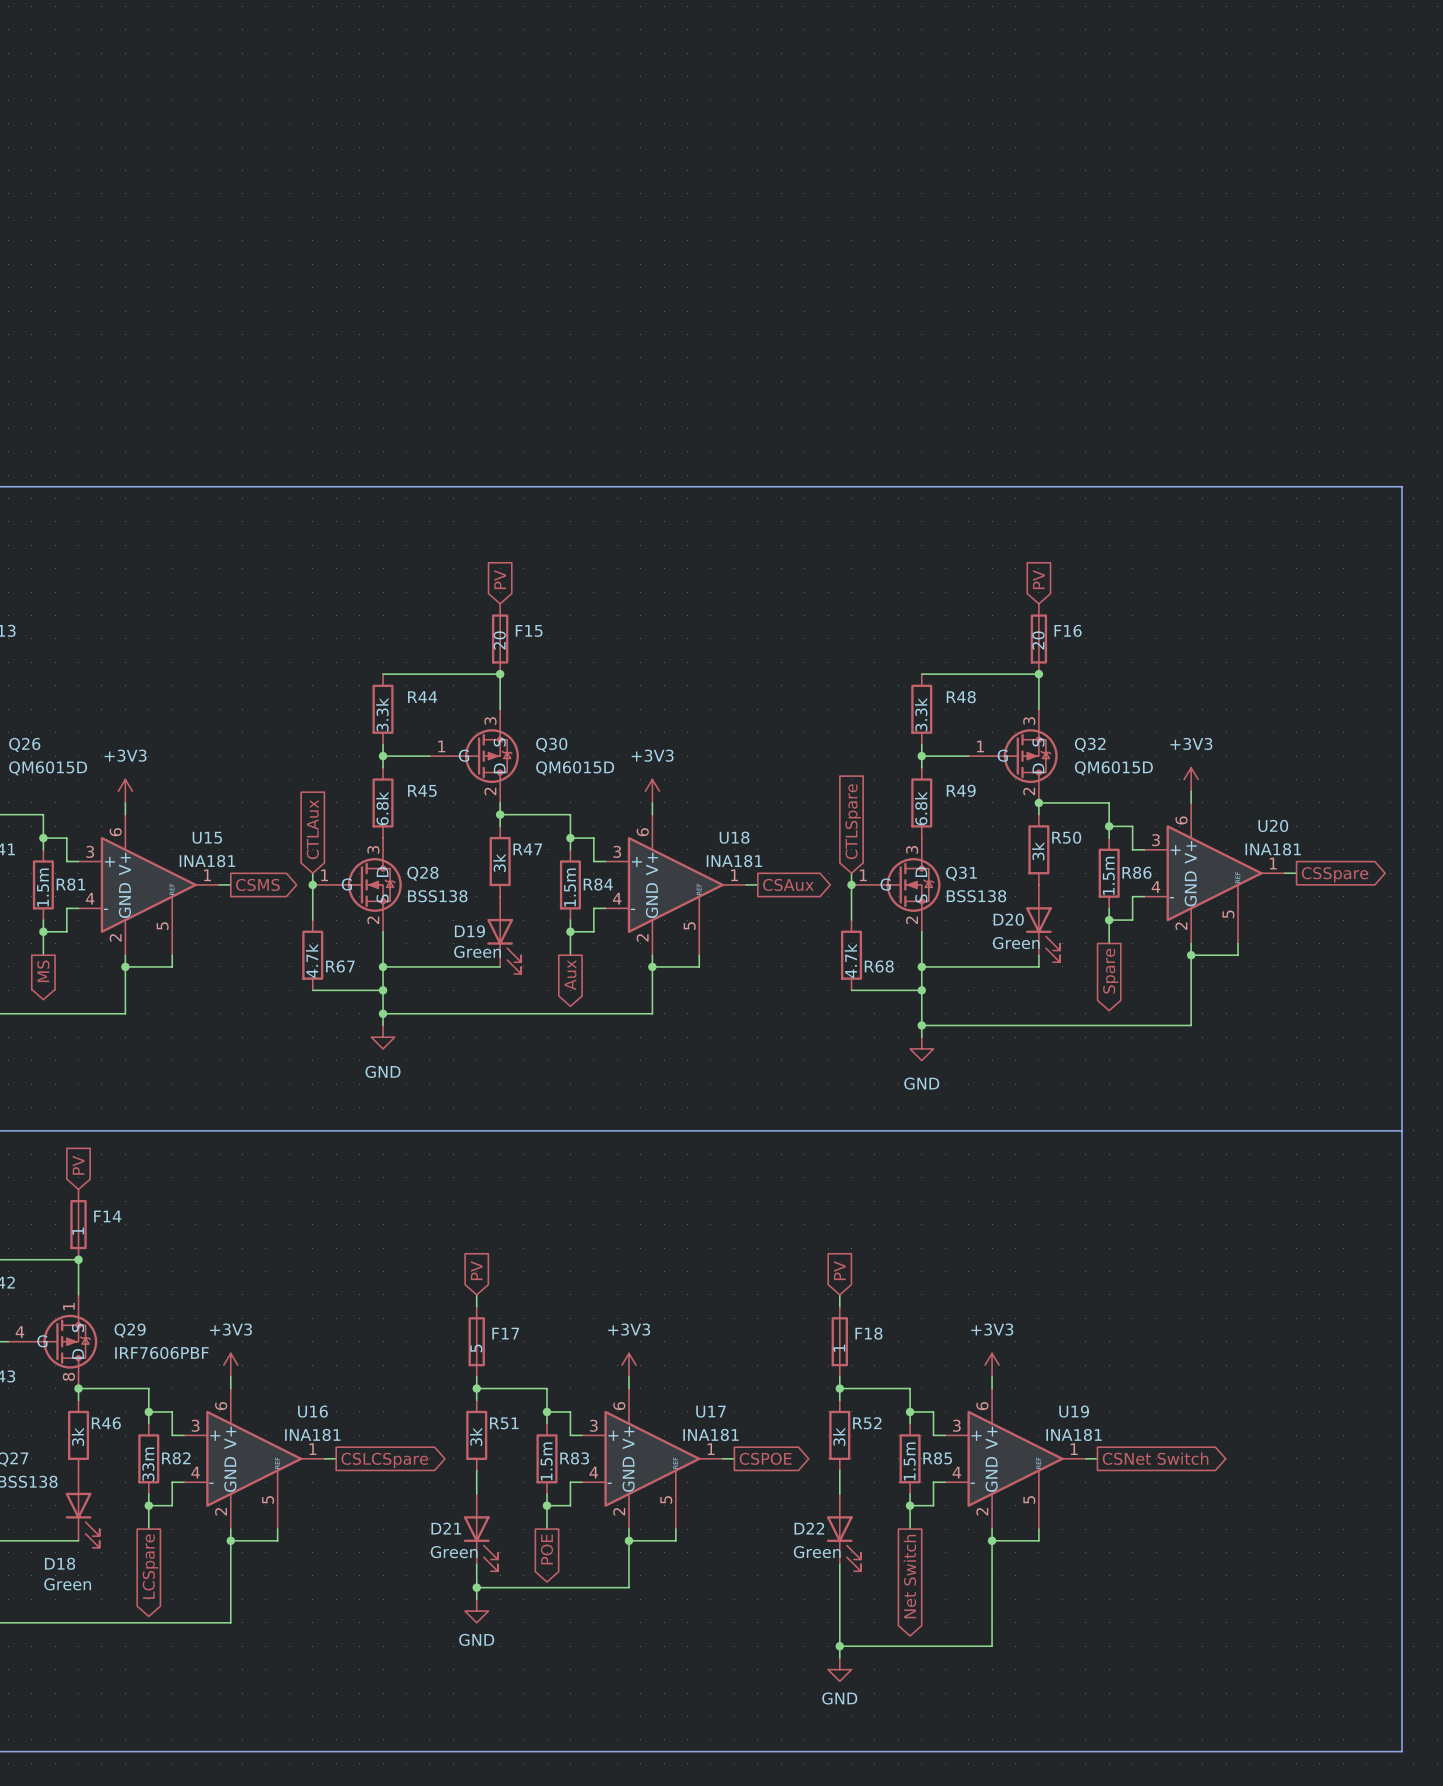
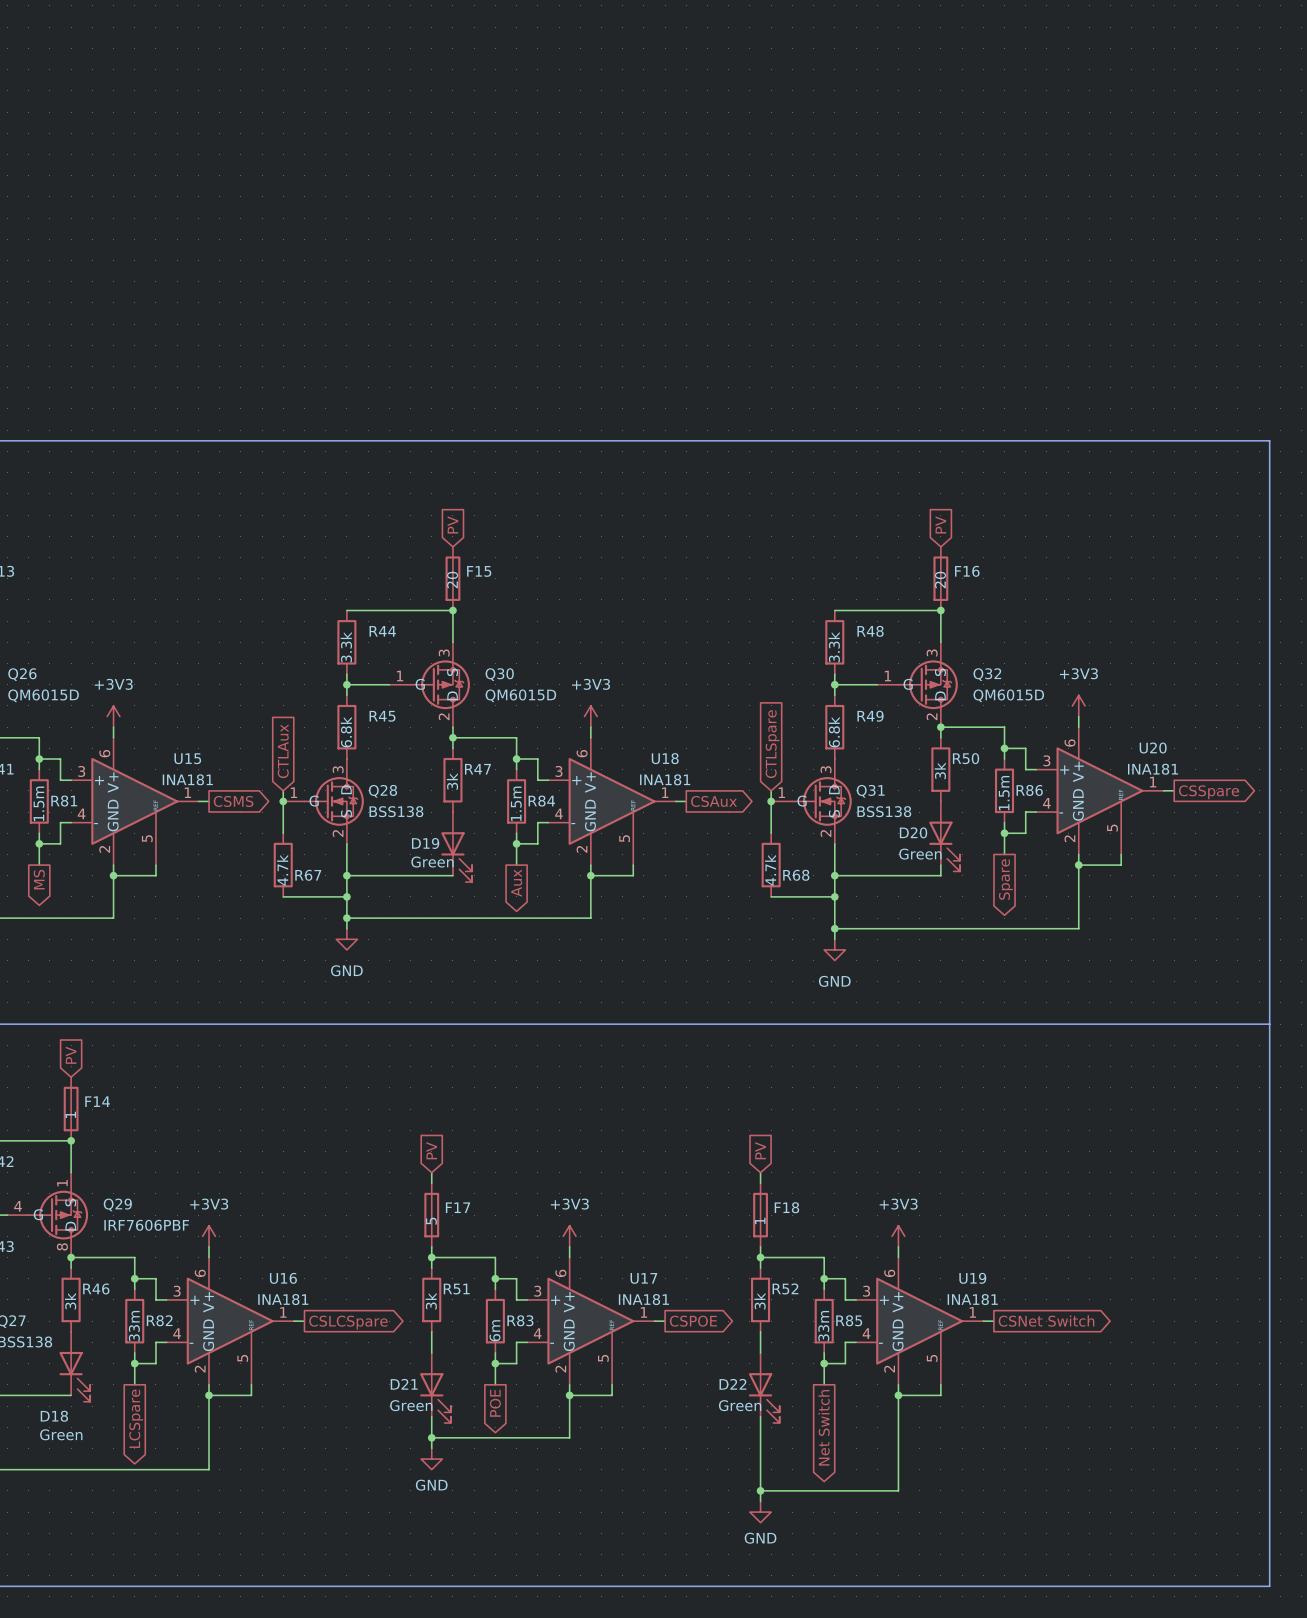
R83 value: 1.5m (546, 1461) -> 6m (495, 1330)
R85 value: 1.5m (909, 1461) -> 33m (823, 1326)

